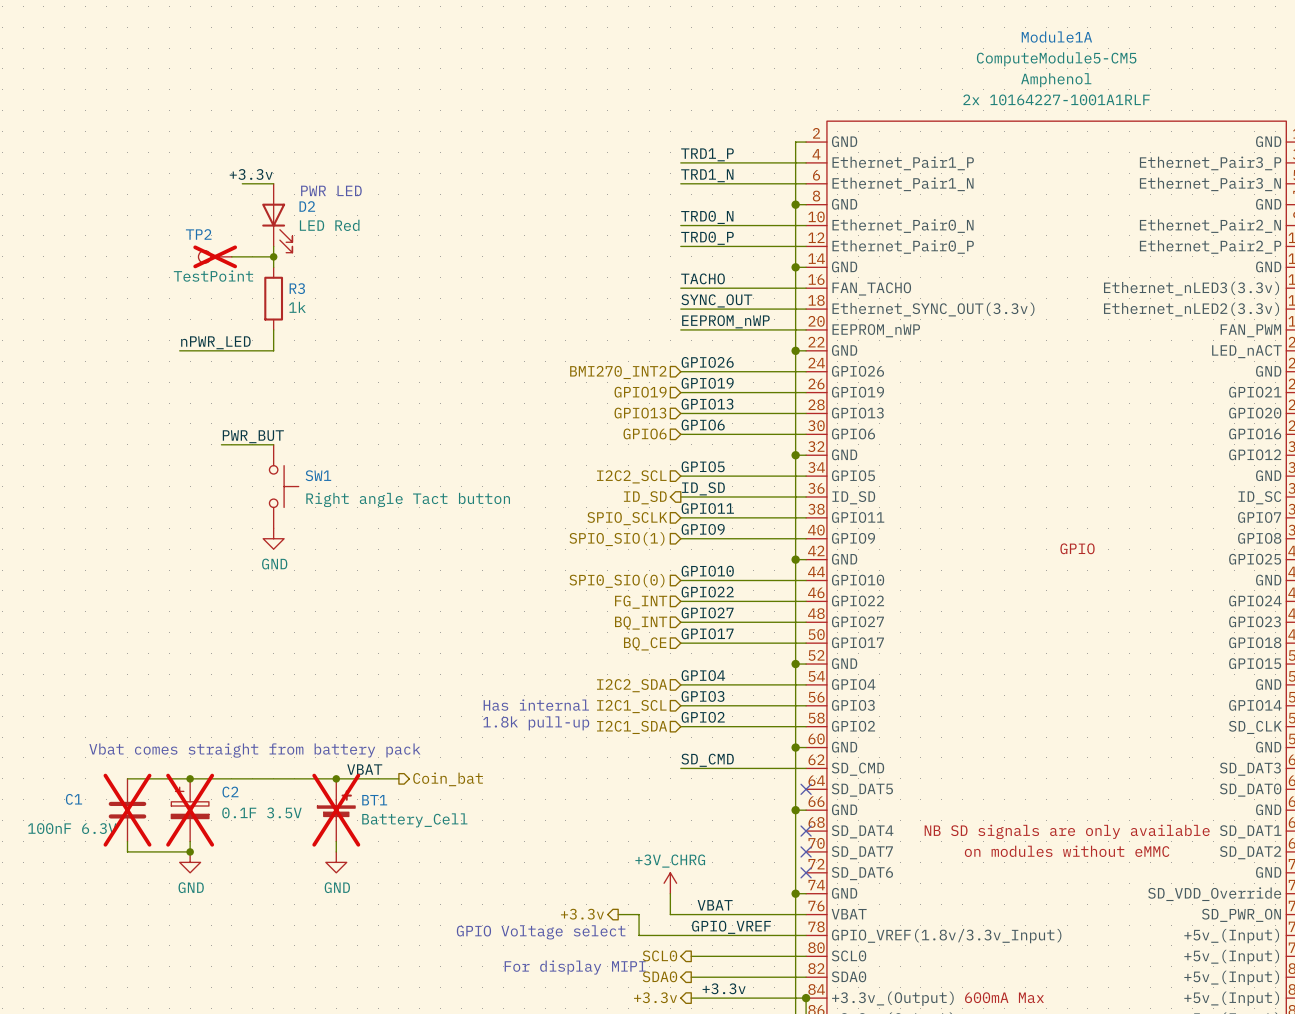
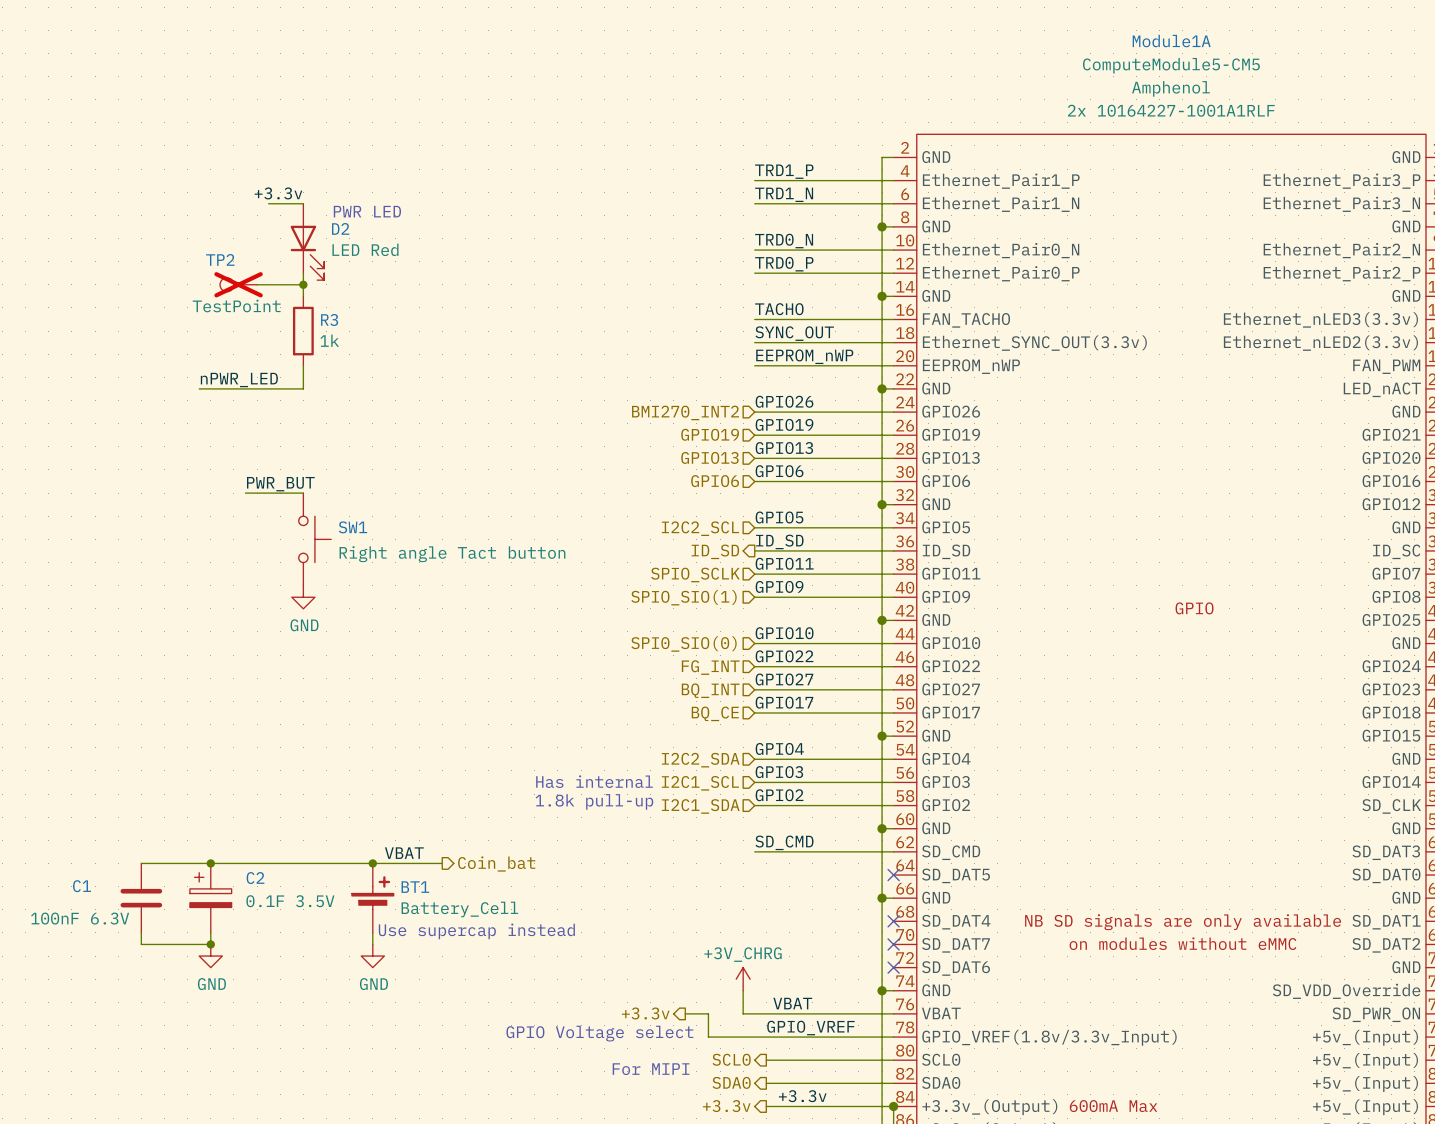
text: Vbat comes straight from battery pack (254, 750) -> none
C1 do-not-place cross: (127, 810) -> none
C2 do-not-place cross: (190, 810) -> none
BT1 do-not-place cross: (336, 810) -> none
text: none -> Use supercap instead (476, 931)
text: For display MIPI (575, 967) -> For MIPI (651, 1069)

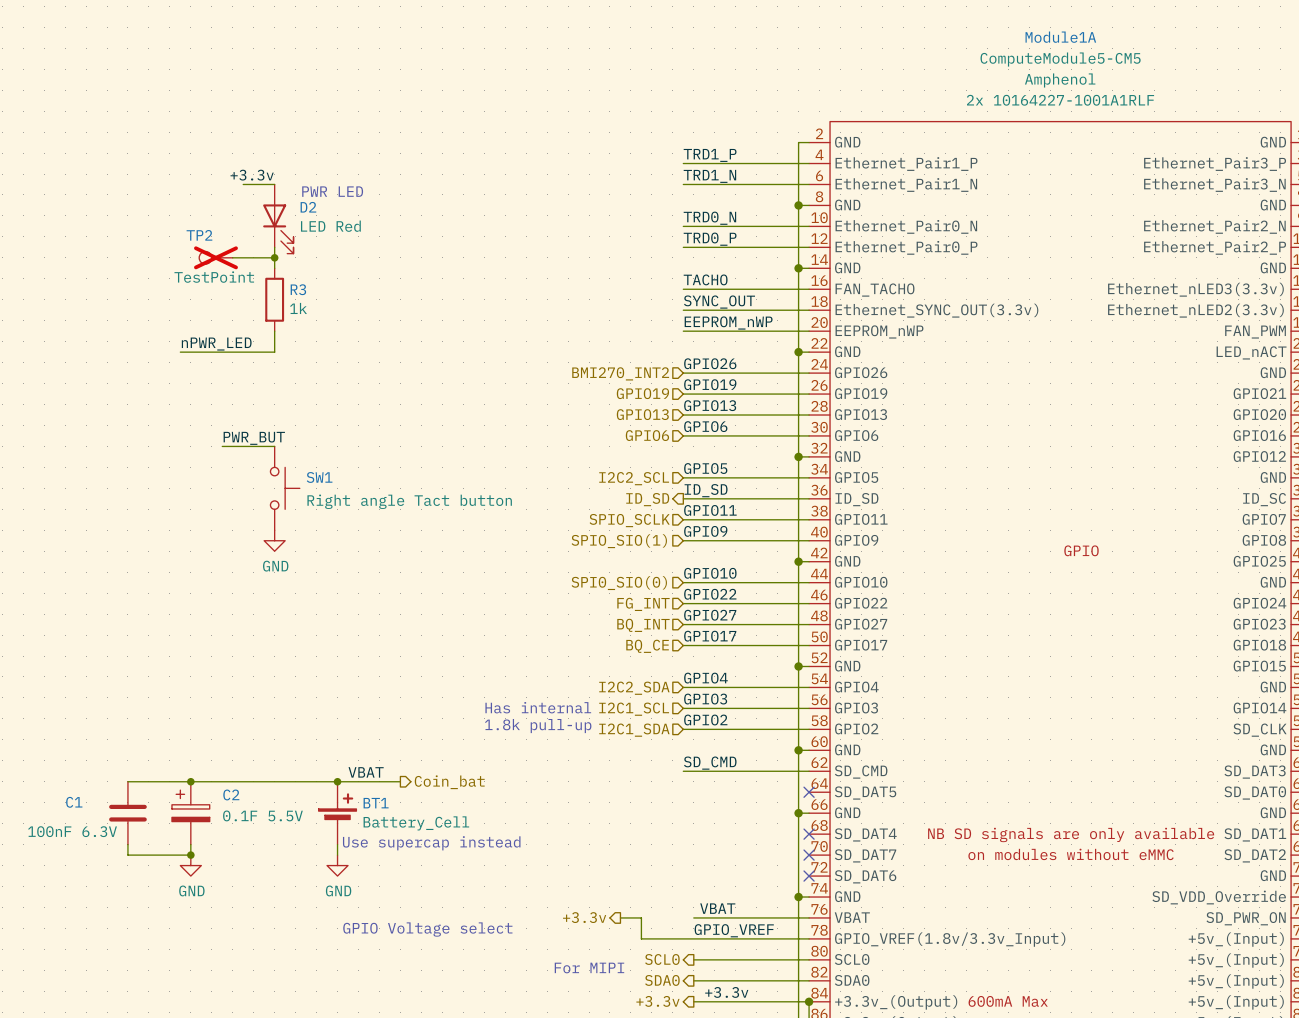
C2 value: 0.1F 3.5V (290, 901) -> 0.1F 5.5V (262, 815)
power symbol: +3V_CHRG (743, 979) -> none
wire: (743, 990) (743, 1013) (766, 1013) -> none
text position: GPIO Voltage select (599, 1033) -> GPIO Voltage select (427, 929)

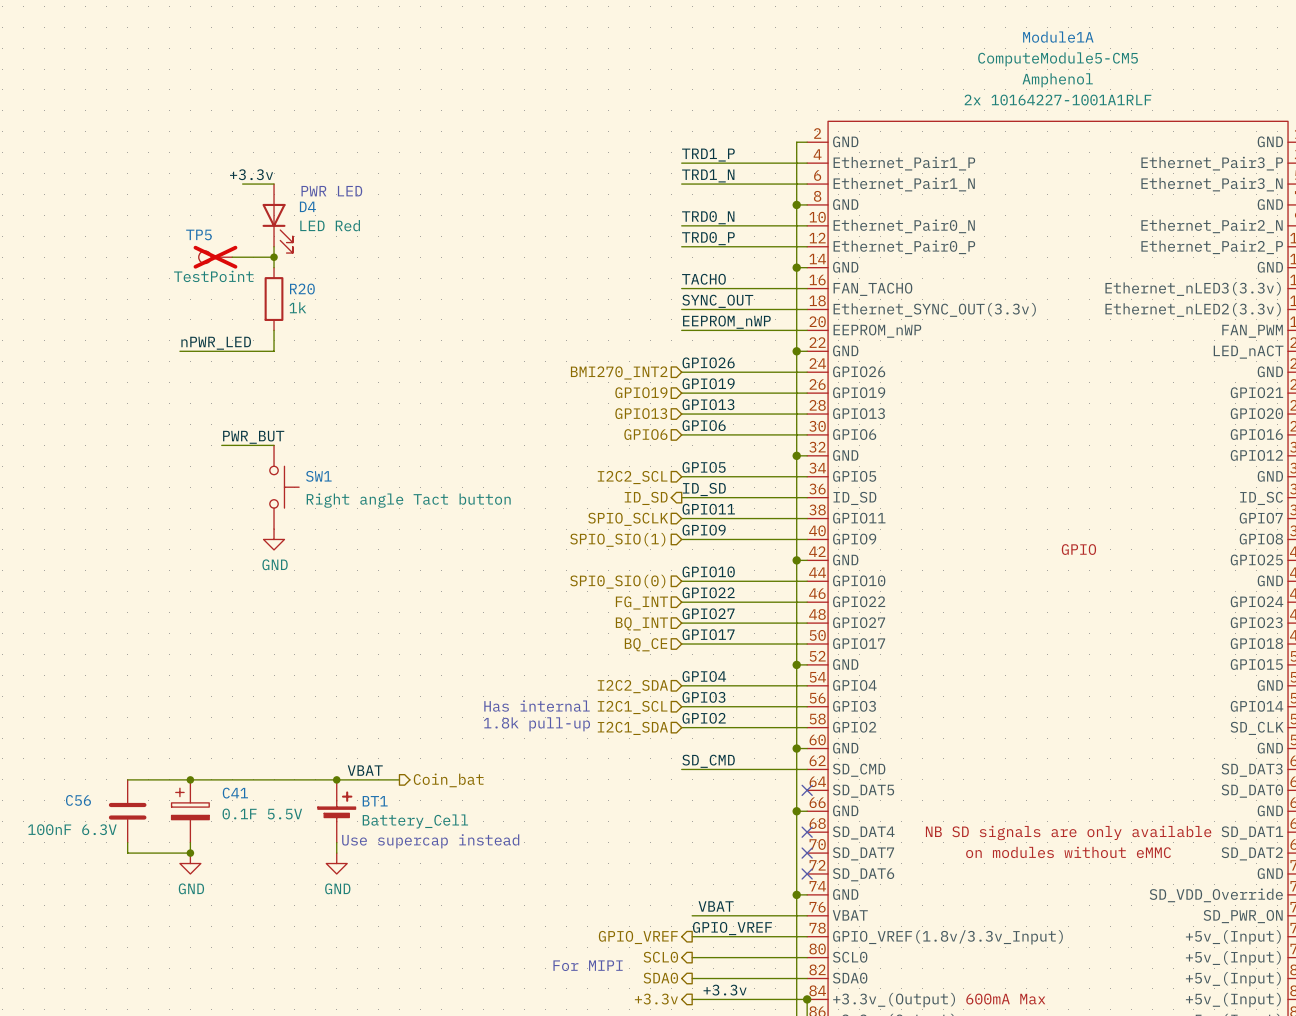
D2 name: D2 (308, 207) -> D4 (307, 206)
TP2 name: TP2 (199, 235) -> TP5 (198, 234)
R3 name: R3 (298, 289) -> R20 (302, 289)
C2 name: C2 (231, 794) -> C41 (235, 793)
C1 name: C1 (74, 802) -> C56 (78, 800)
hierarchical label: +3.3v (584, 917) -> none
wire: (620, 917) (641, 917) (641, 938) (693, 938) -> none
text: GPIO Voltage select (427, 929) -> none
hierarchical label: none -> GPIO_VREF (638, 937)

